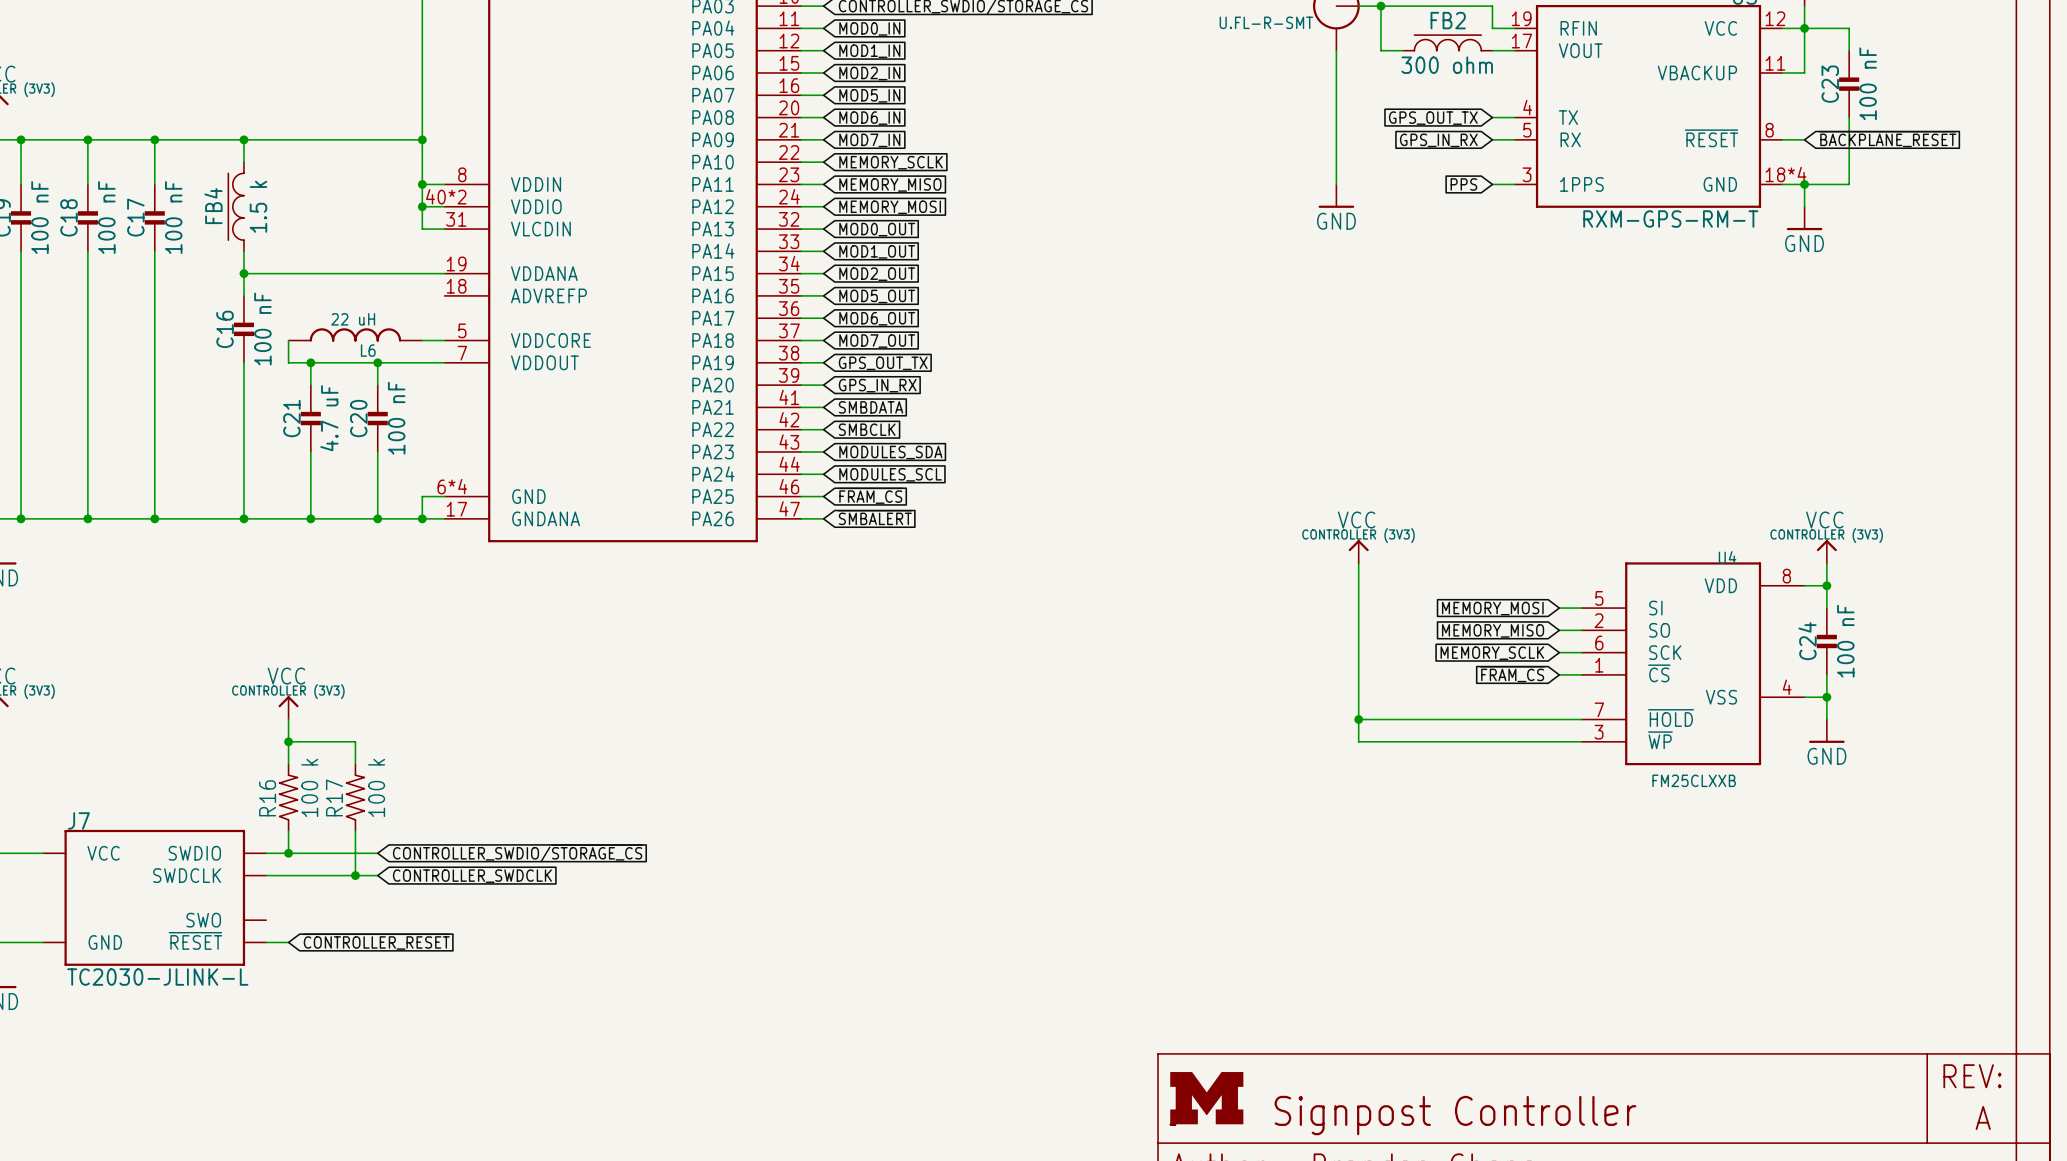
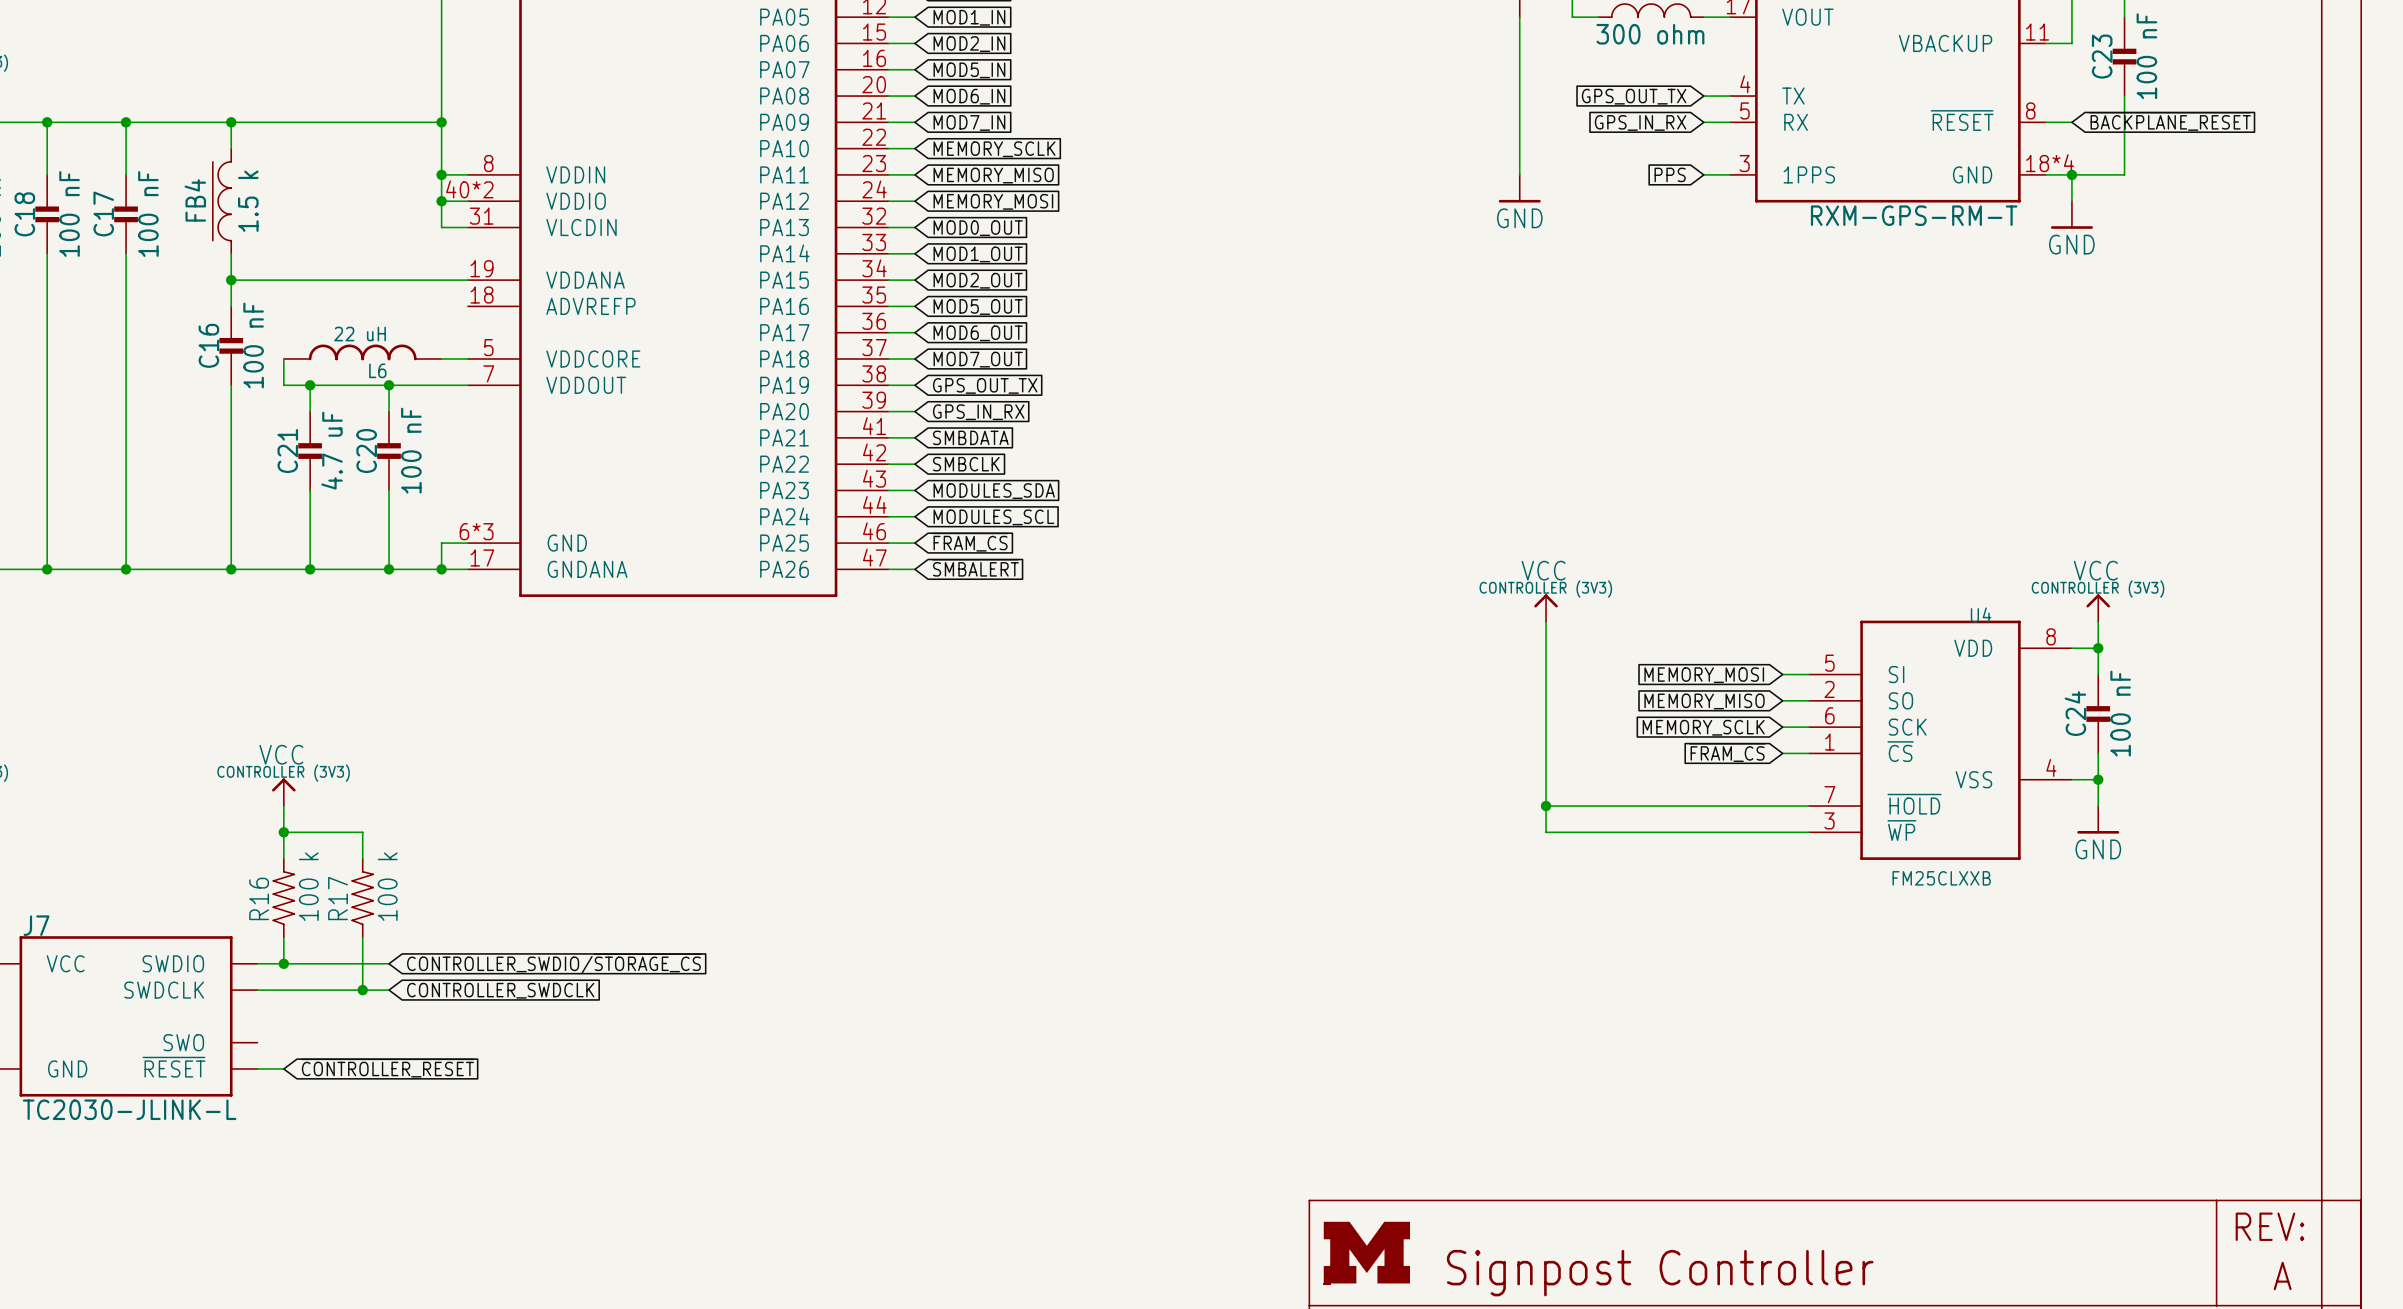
part pin number: 6*4 (452, 486) -> 6*3 (476, 531)

